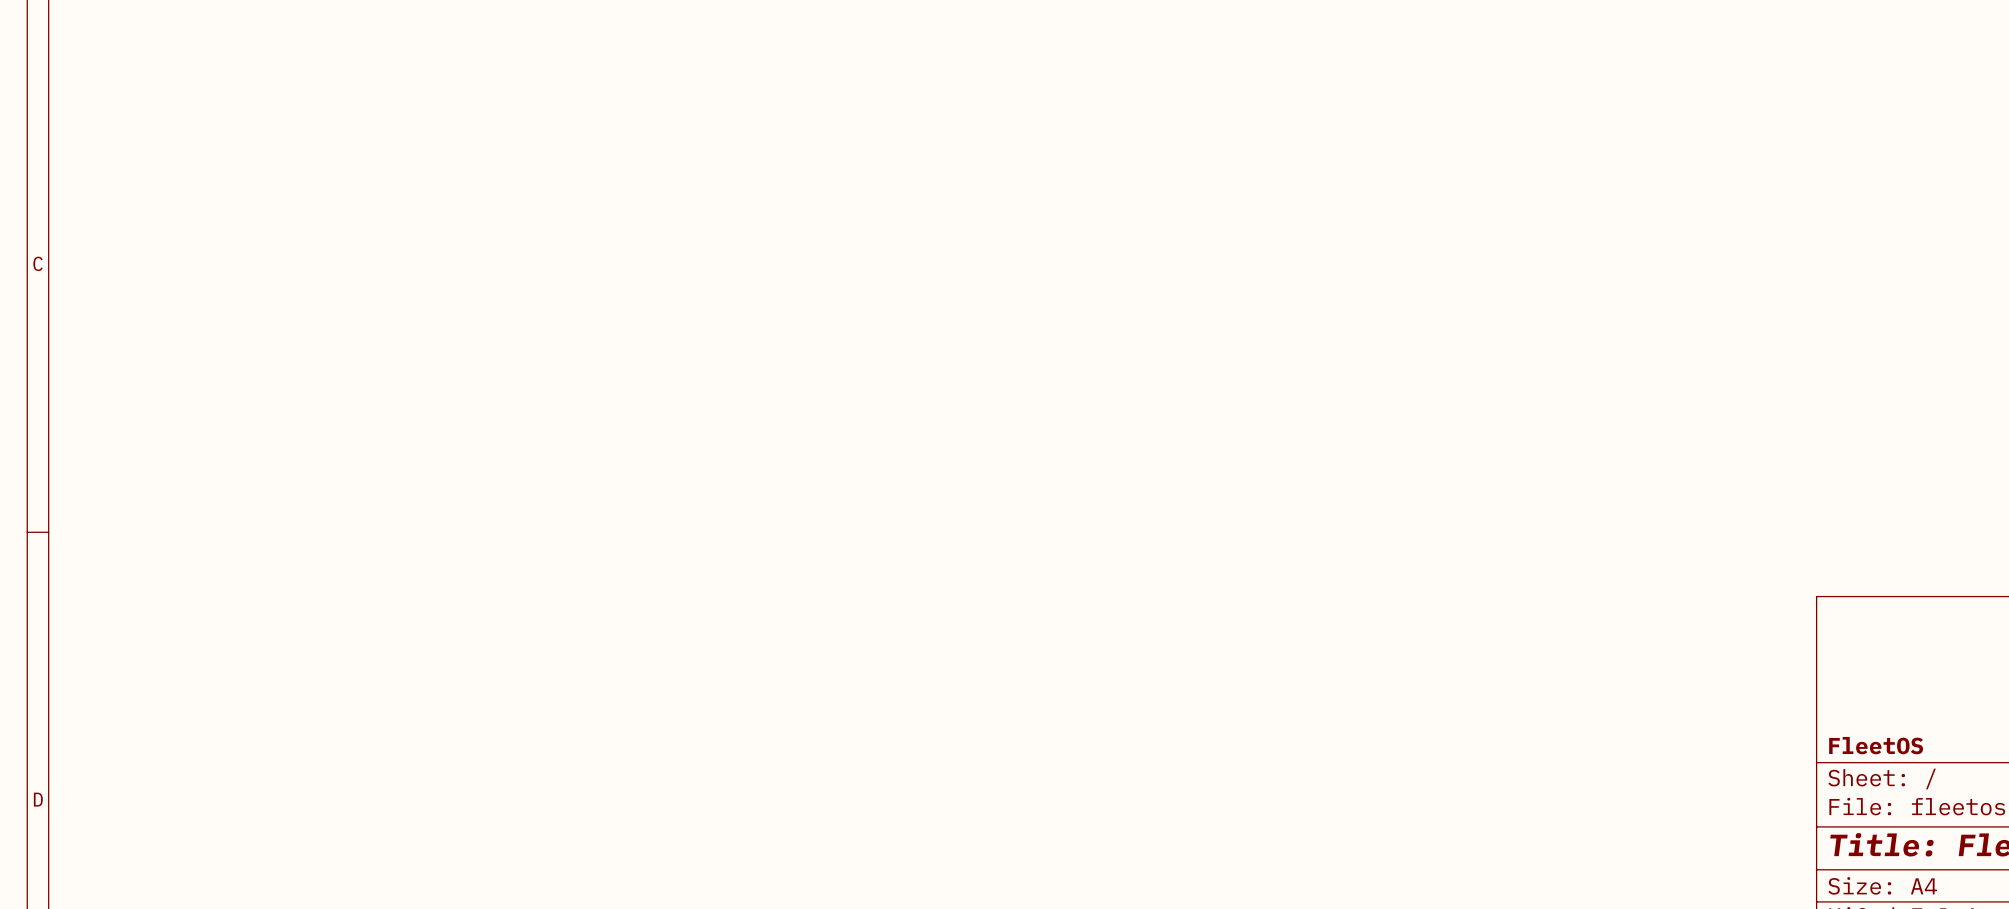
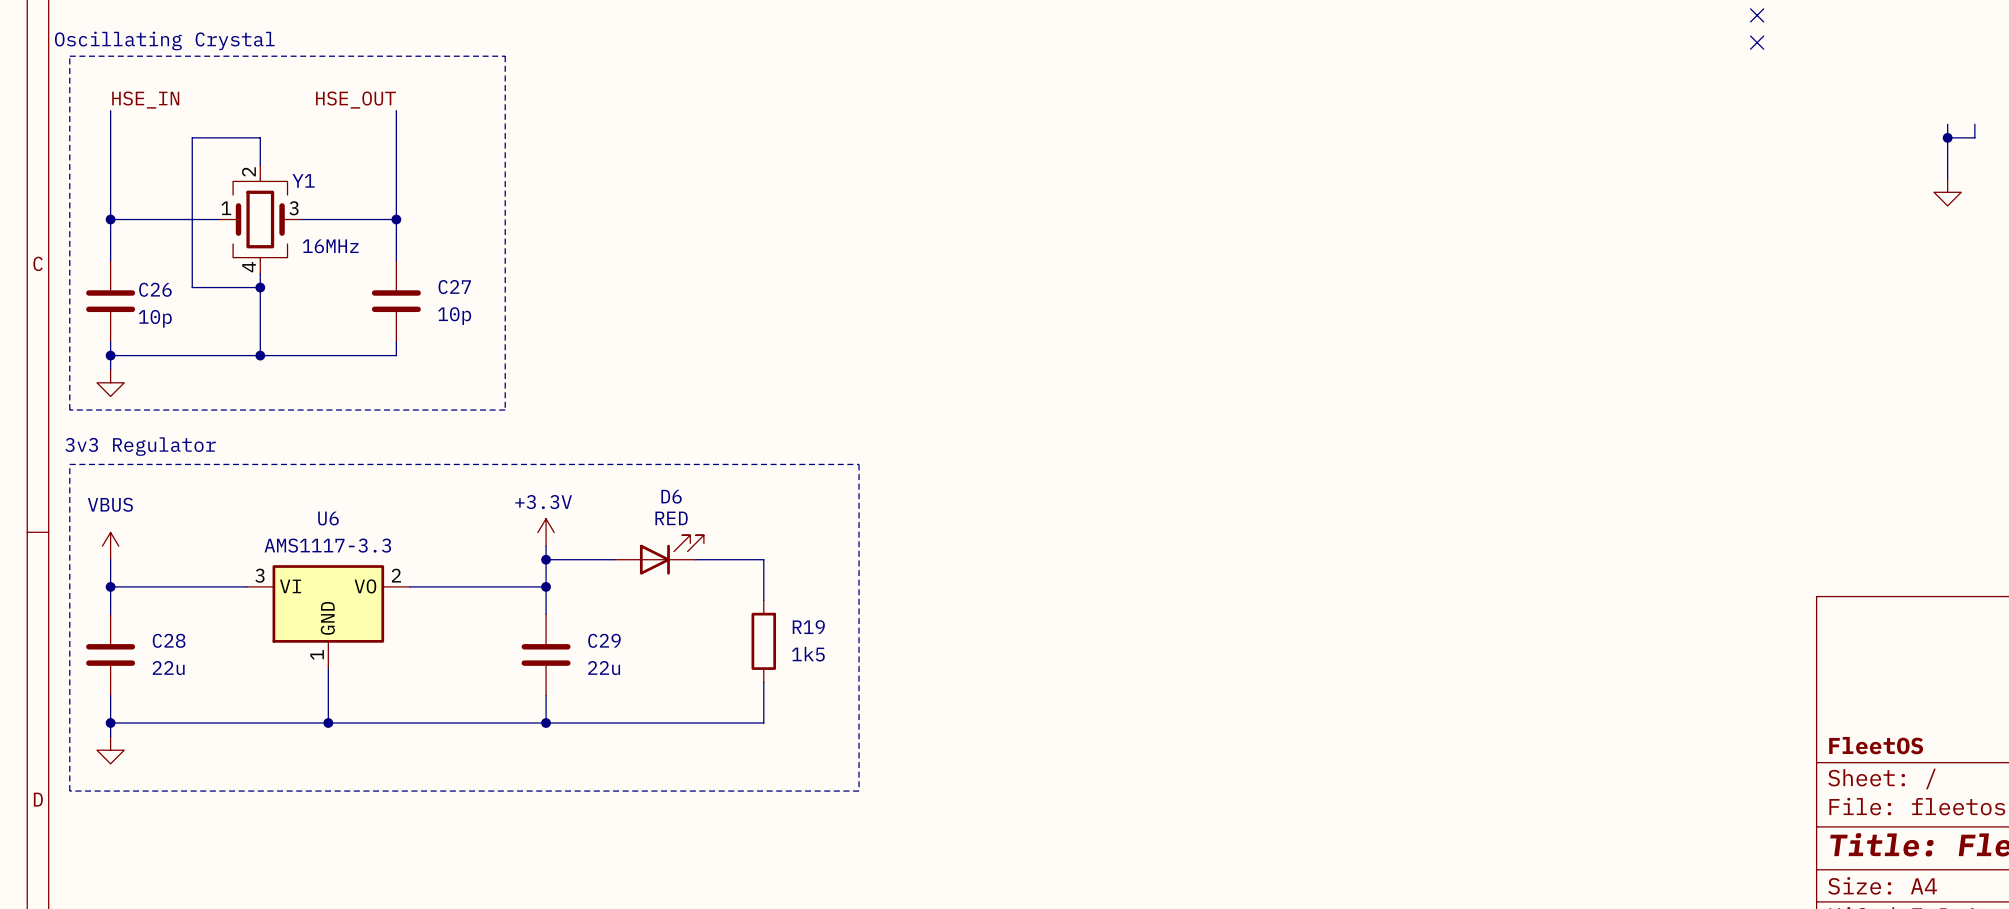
no-connect mark: none -> (1757, 15)
text: none -> Oscillating Crystal (164, 41)
no-connect mark: none -> (1757, 42)
line: none -> (69, 56) (505, 56) (505, 410) (69, 410) (69, 56)
label: none -> HSE_IN (145, 100)
label: none -> HSE_OUT (355, 100)
wire: none -> (110, 110) (110, 260)
wire: none -> (396, 110) (396, 260)
wire: none -> (1947, 124) (1947, 178)
wire: none -> (1974, 124) (1974, 137) (1947, 137)
junction: none -> (1947, 137)
wire: none -> (260, 165) (260, 137) (192, 137) (192, 287) (260, 287)
power symbol: none -> (1947, 192)
wire: none -> (110, 219) (219, 219)
junction: none -> (110, 219)
Y1: none -> 16MHz (260, 219)
wire: none -> (301, 219) (396, 219)
junction: none -> (396, 219)
wire: none -> (260, 273) (260, 355)
junction: none -> (260, 287)
C26: none -> 10p (110, 301)
C27: none -> 10p (396, 301)
wire: none -> (110, 341) (110, 369)
wire: none -> (396, 341) (396, 355) (110, 355)
junction: none -> (110, 355)
junction: none -> (260, 355)
power symbol: none -> (110, 382)
text: none -> 3v3 Regulator (140, 446)
line: none -> (69, 464) (69, 791) (859, 791) (859, 464) (69, 464)
power symbol: none -> +3.3V (546, 532)
power symbol: none -> VBUS (110, 546)
wire: none -> (546, 546) (546, 614)
D6: none -> RED (659, 554)
wire: none -> (110, 559) (110, 614)
wire: none -> (546, 559) (614, 559)
junction: none -> (546, 559)
wire: none -> (695, 559) (763, 559) (763, 600)
wire: none -> (110, 586) (246, 586)
junction: none -> (110, 586)
wire: none -> (409, 586) (546, 586)
junction: none -> (546, 586)
U6: none -> AMS1117-3.3 (328, 616)
R19: none -> 1k5 (763, 641)
C28: none -> 22u (110, 654)
C29: none -> 22u (546, 654)
wire: none -> (328, 668) (328, 723)
wire: none -> (763, 682) (763, 723) (110, 723)
wire: none -> (110, 695) (110, 736)
wire: none -> (546, 695) (546, 723)
junction: none -> (110, 723)
junction: none -> (328, 723)
junction: none -> (546, 723)
power symbol: none -> (110, 750)

